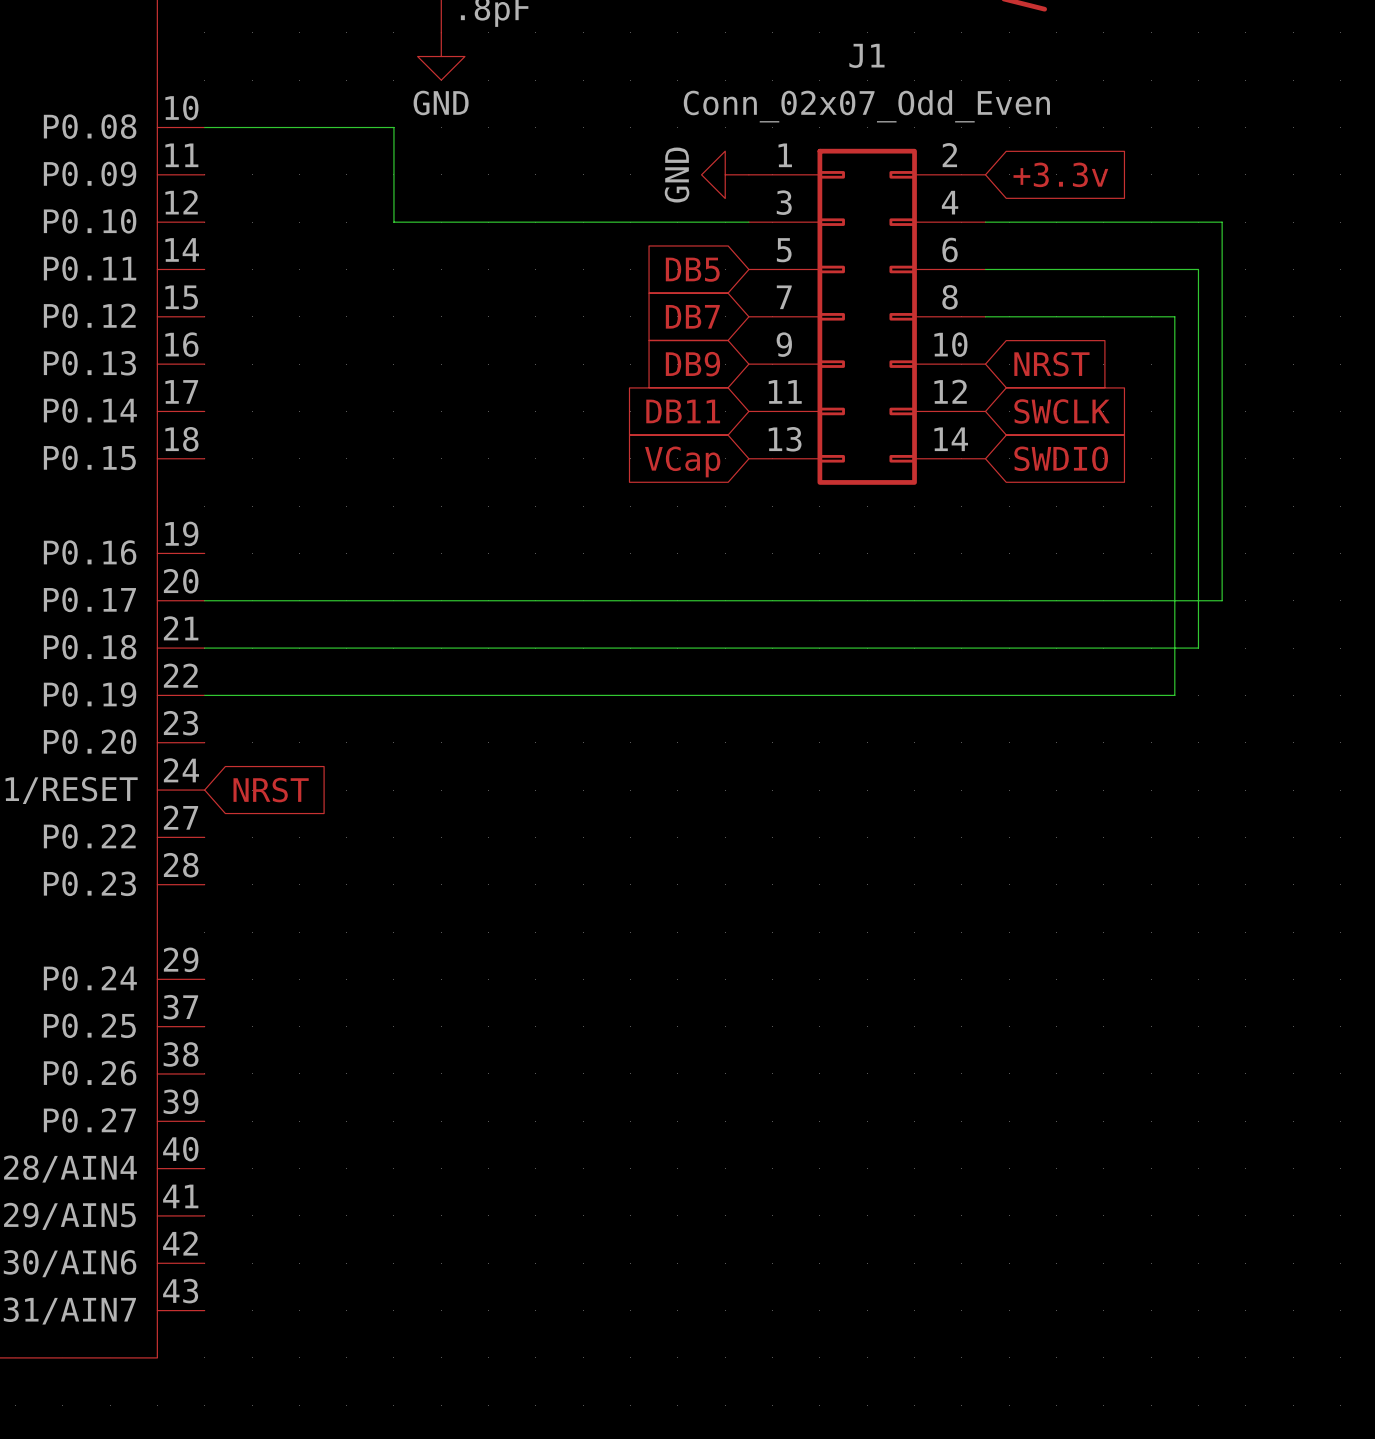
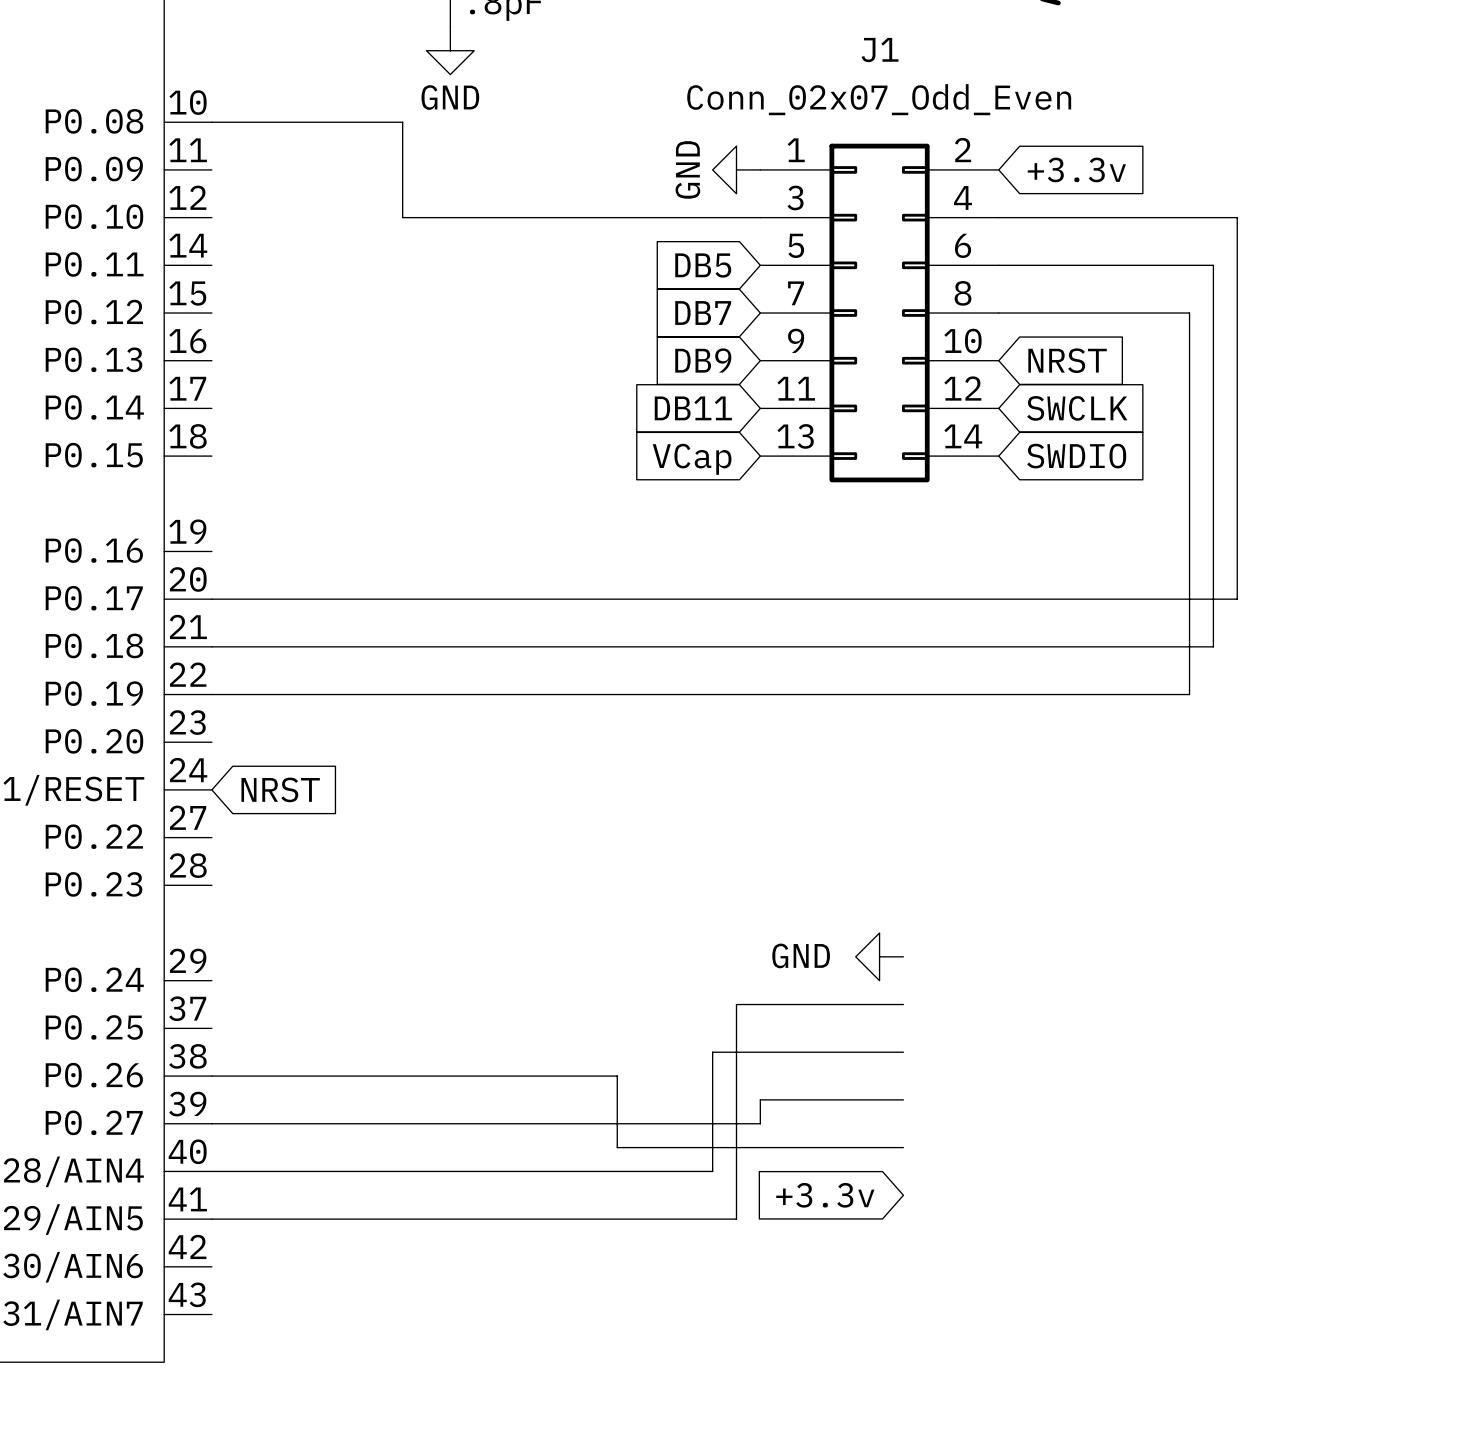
power symbol: none -> GND (879, 956)
wire: none -> (903, 1004) (736, 1004) (736, 1219) (211, 1219)
wire: none -> (903, 1052) (712, 1052) (712, 1171) (211, 1171)
wire: none -> (211, 1076) (617, 1076) (617, 1147) (903, 1147)
wire: none -> (903, 1099) (760, 1099) (760, 1123) (211, 1123)
global label: none -> +3.3v (825, 1195)

